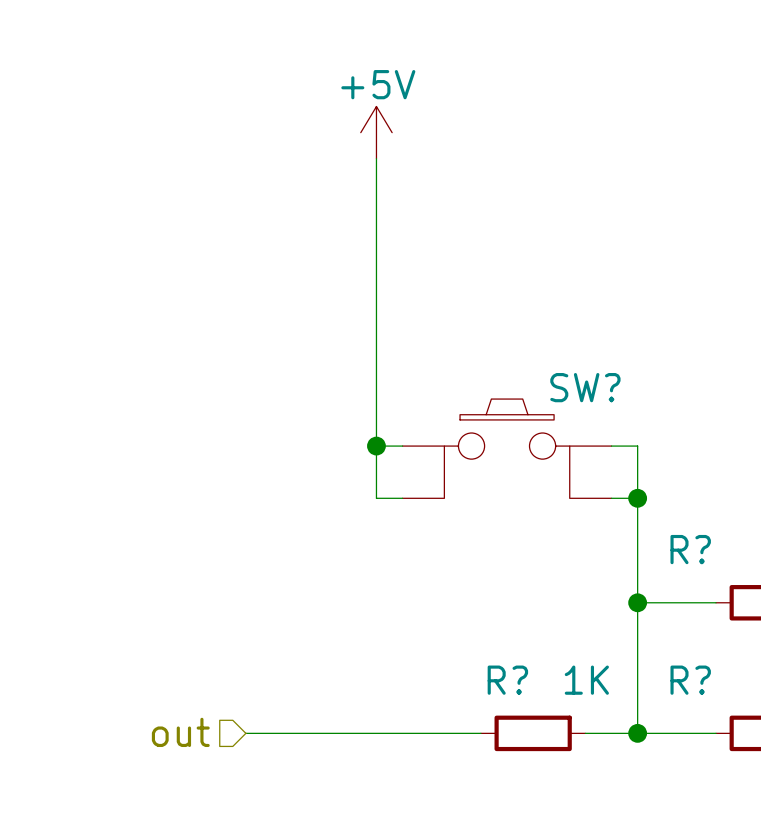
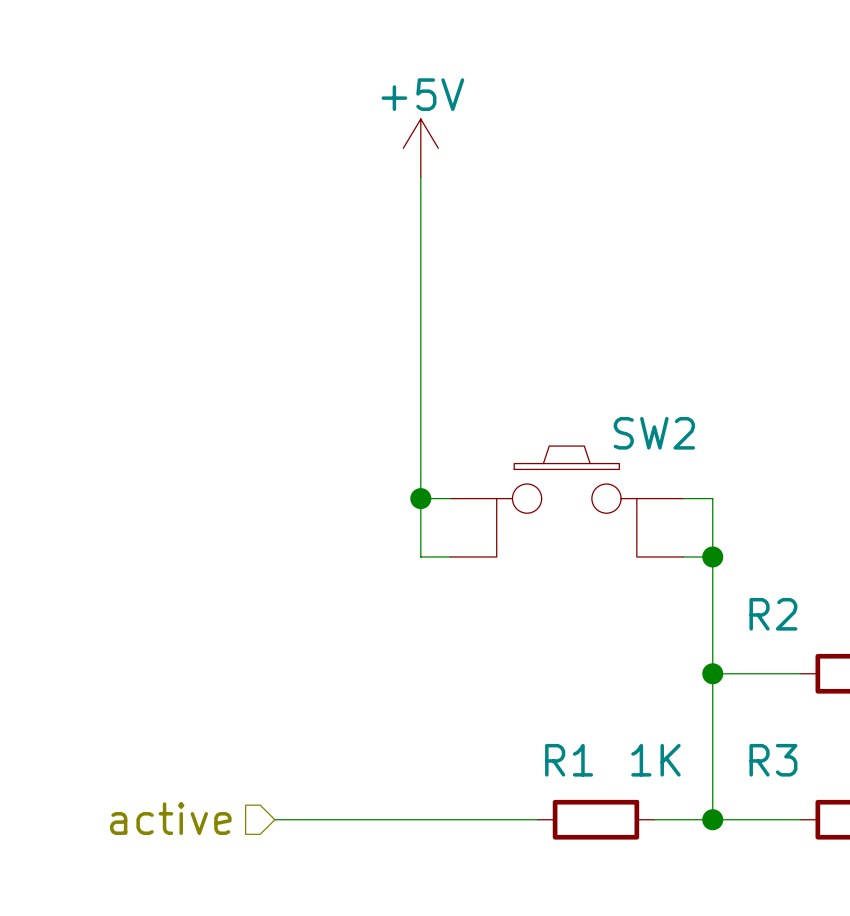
SW? name: SW? (585, 387) -> SW2 (654, 433)
R? name: R? (690, 549) -> R2 (773, 614)
R? name: R? (507, 680) -> R1 (569, 760)
R? name: R? (690, 680) -> R3 (773, 760)
hierarchical label: out (180, 732) -> active (170, 818)

